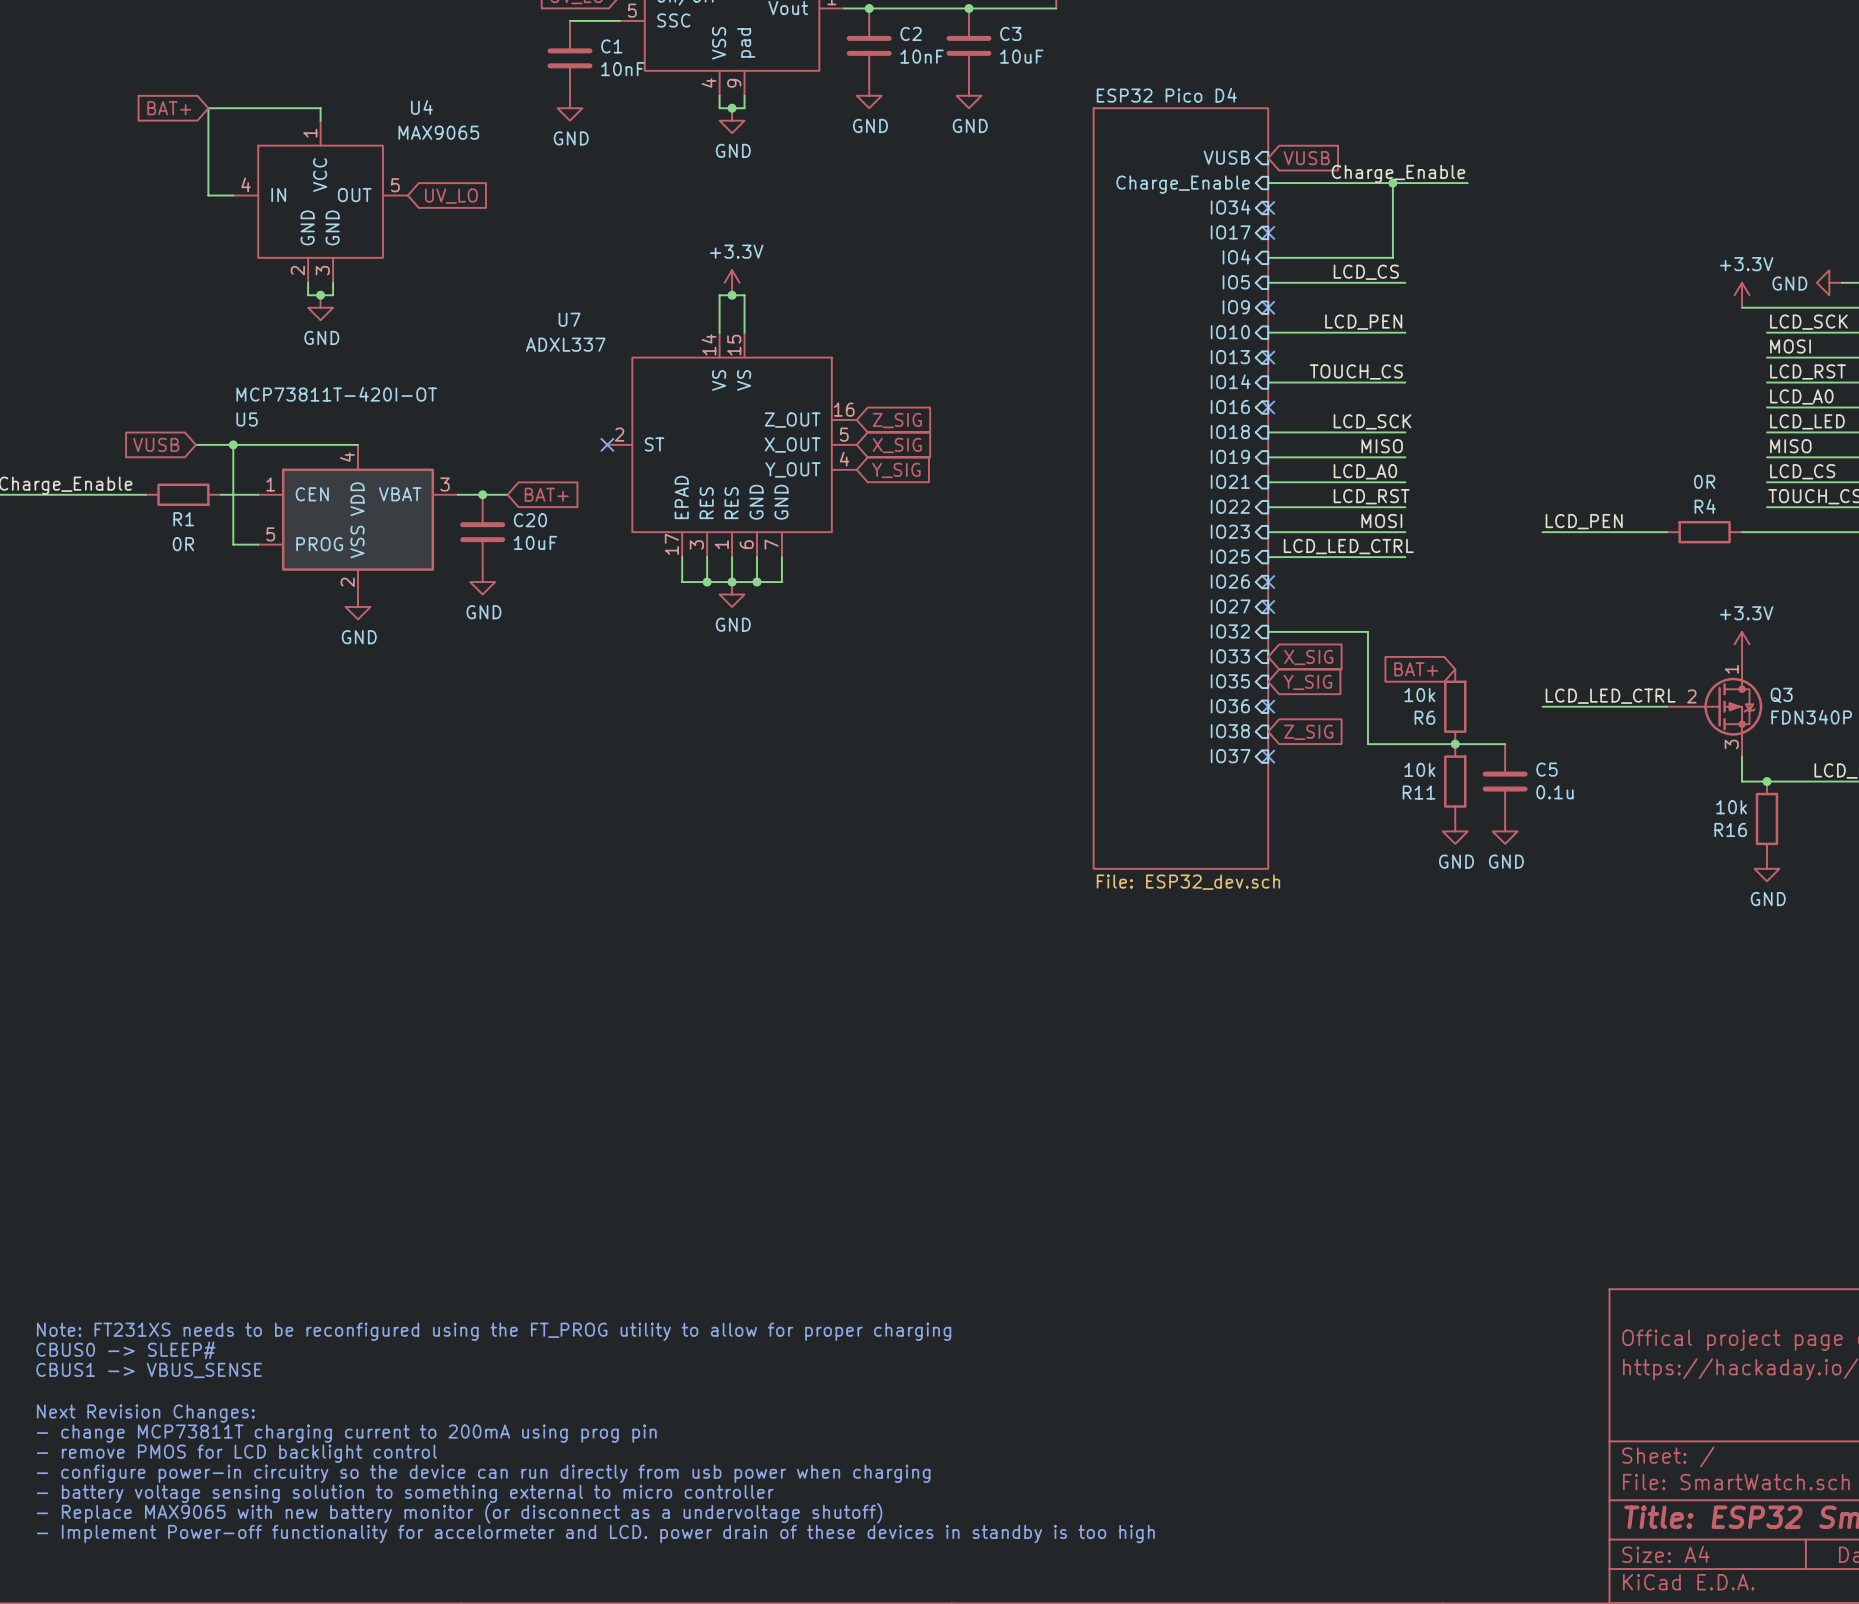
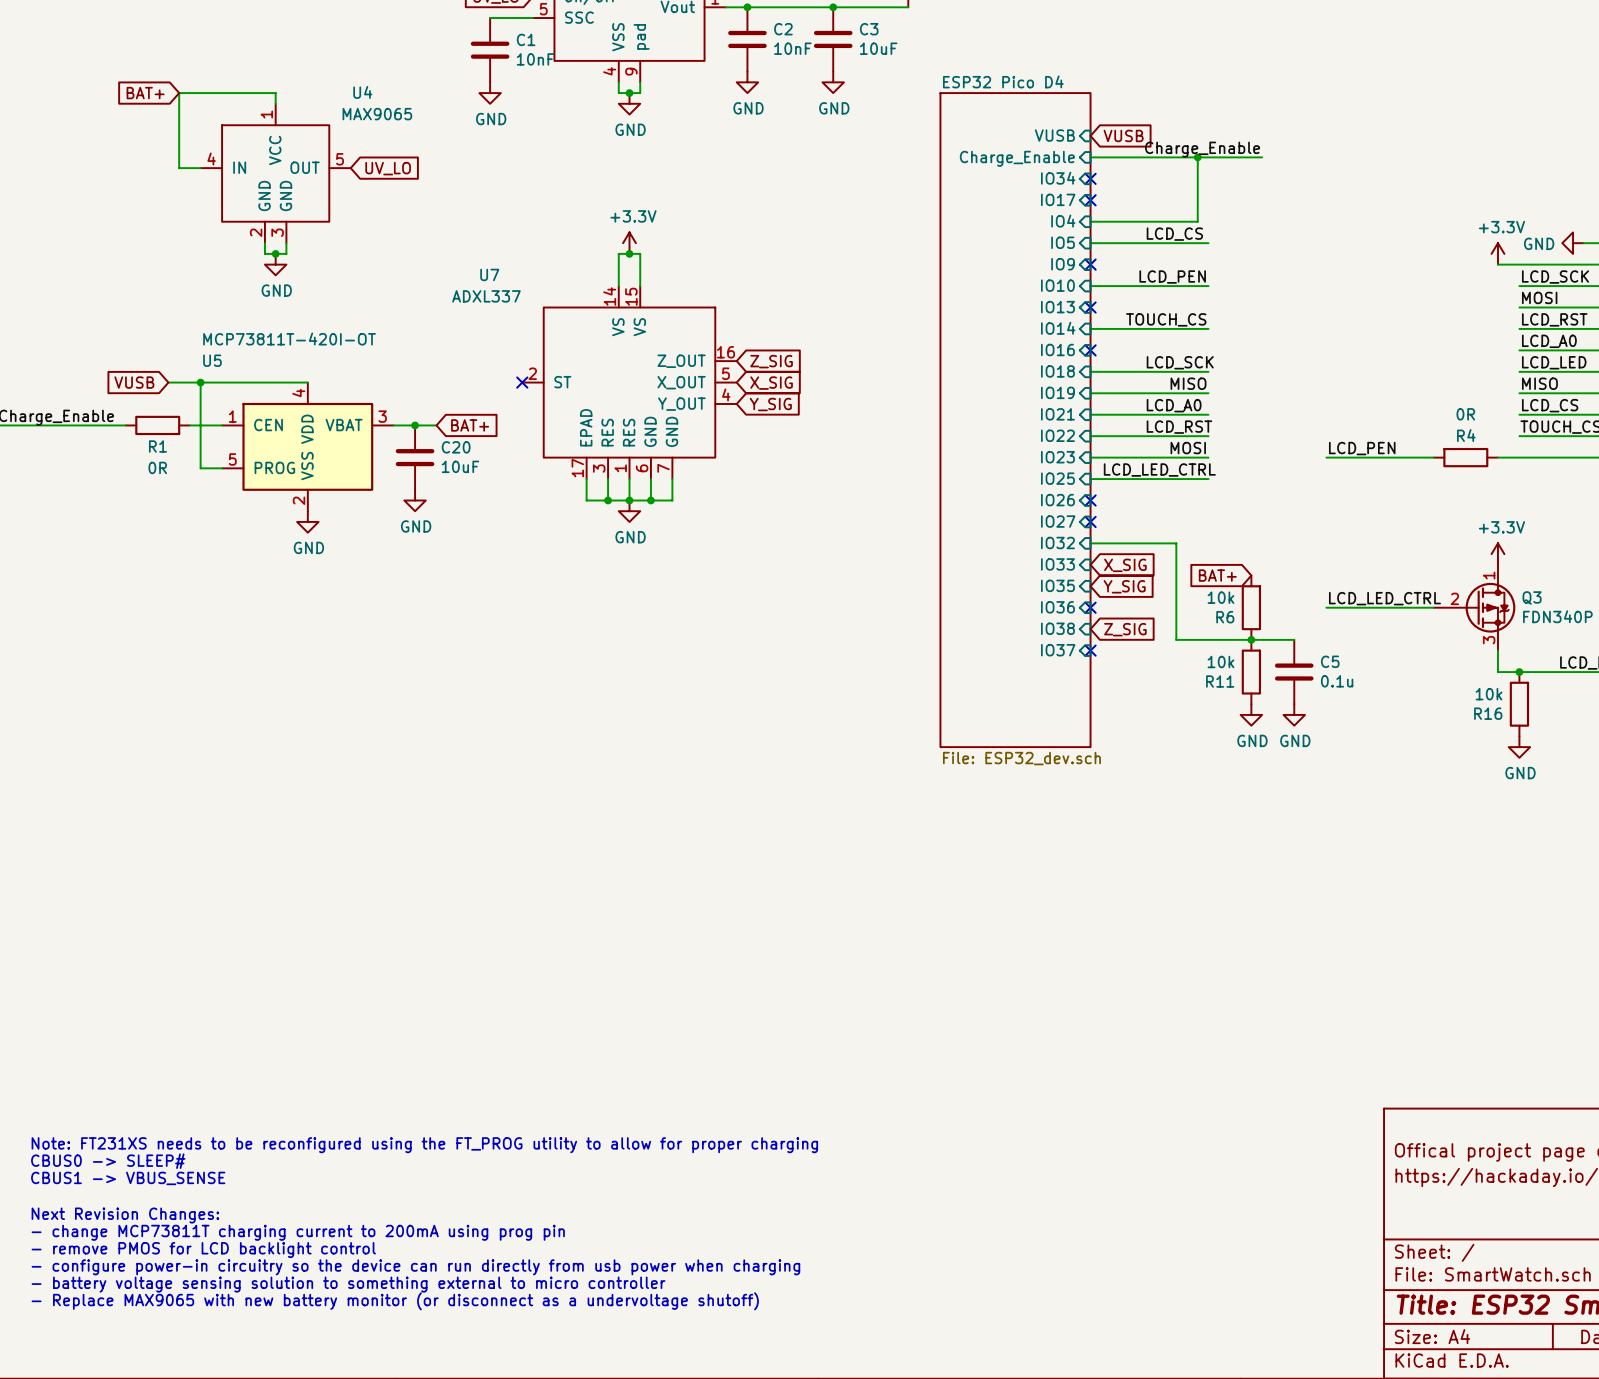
text: - Implement Power-off functionality for accelormeter and LCD. power drain of these devices in standby is too high (595, 1534) -> none

